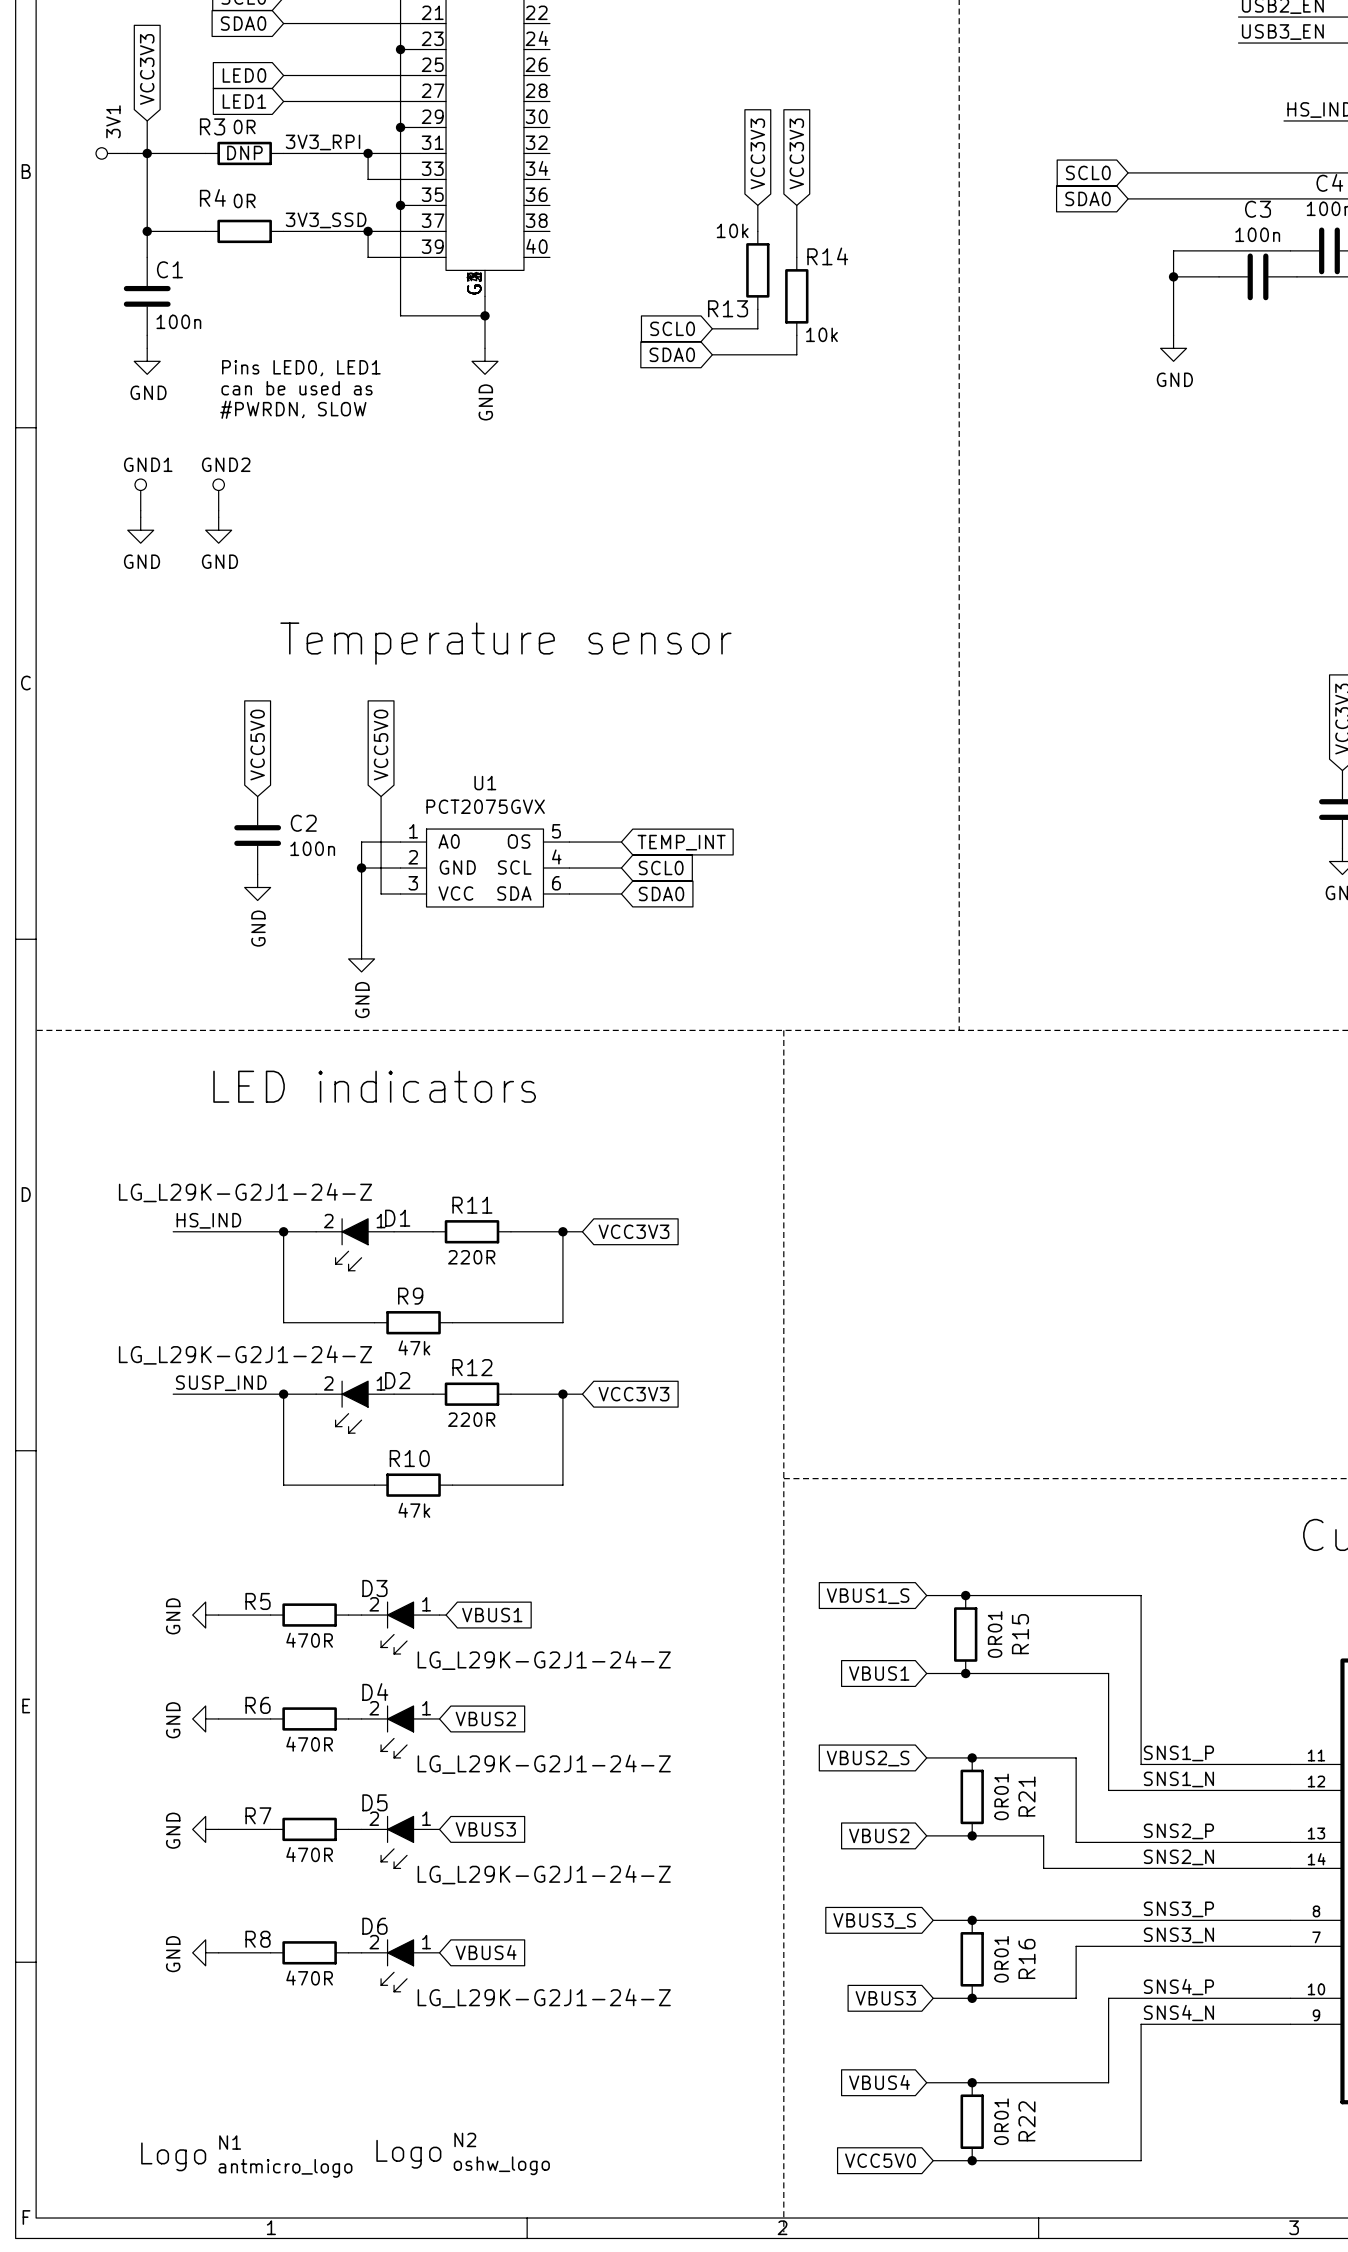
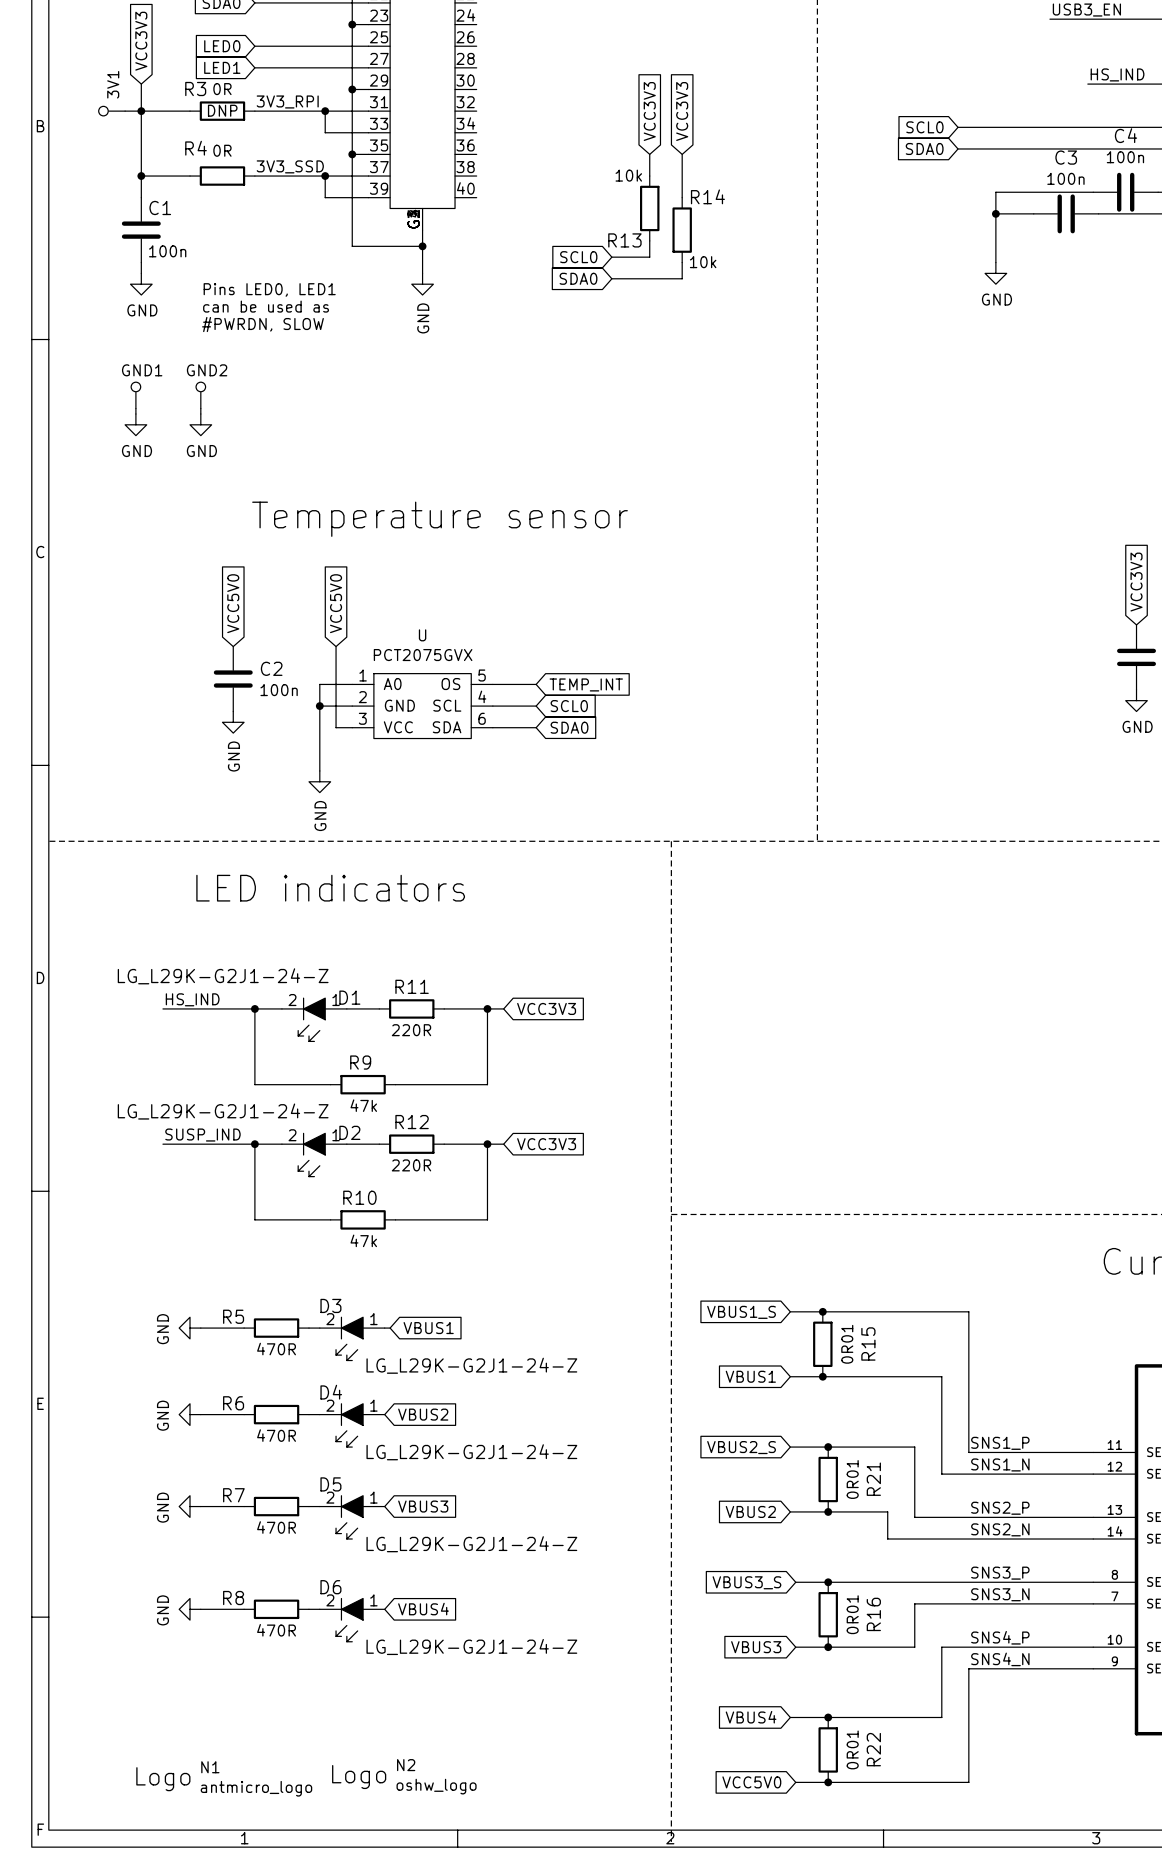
U1 name: U1 (485, 783) -> U (422, 635)

